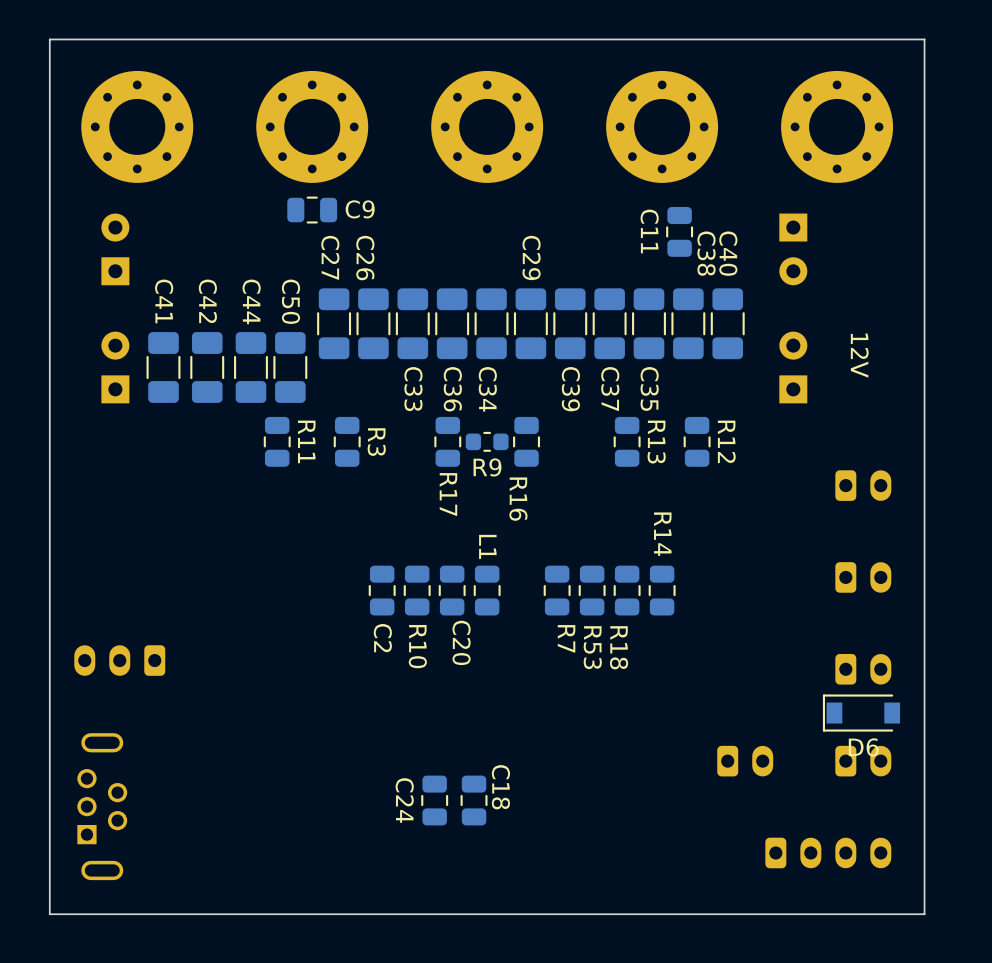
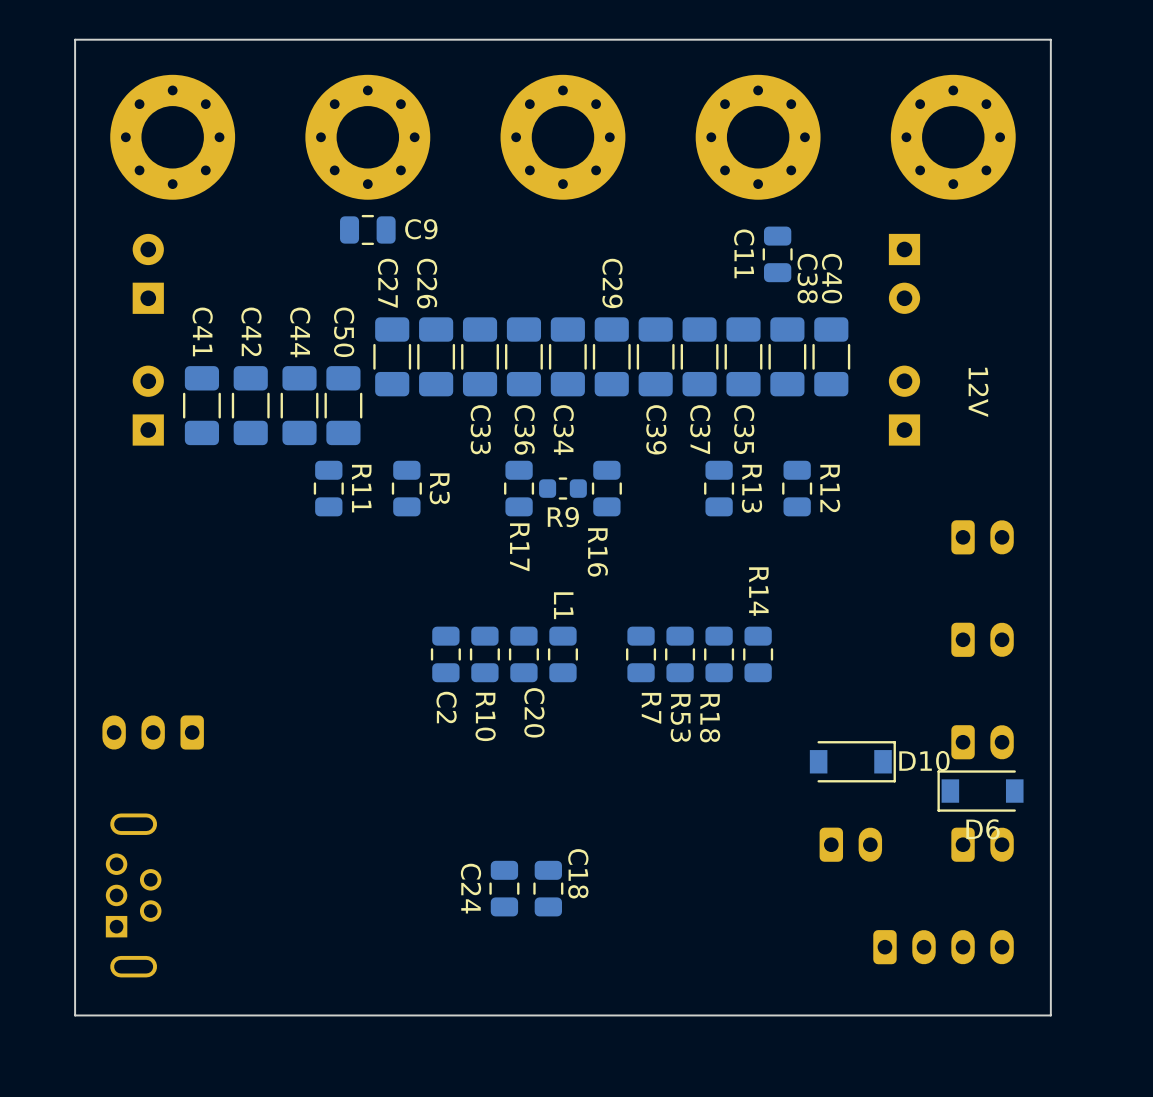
D10: none -> (852, 761)

